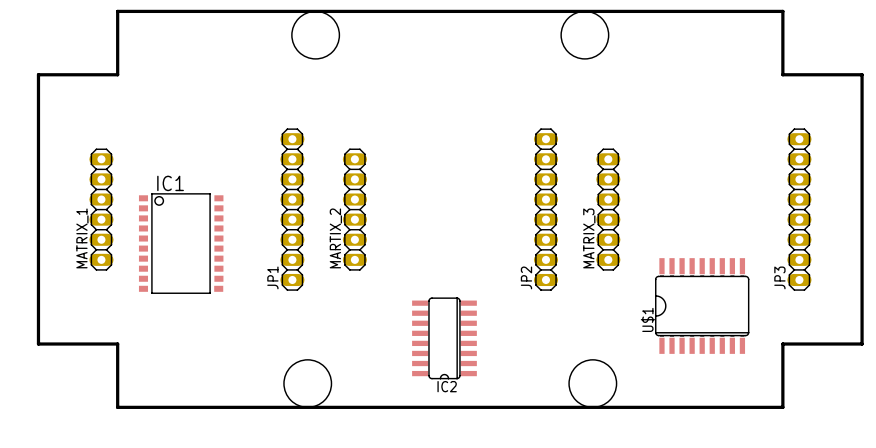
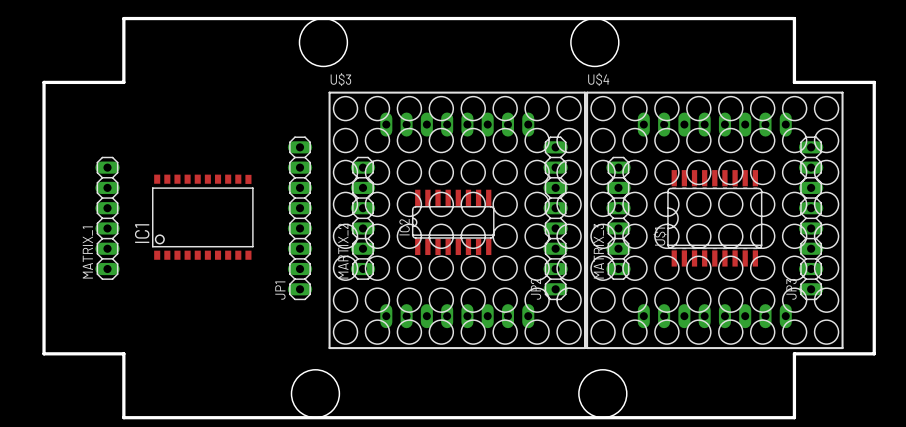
U$3: none -> (457, 220)
U$4: none -> (714, 220)
IC1 rotation: 0° (181, 243) -> 90° counterclockwise (202, 217)
U$1 position: (702, 306) -> (714, 218)
IC2 rotation: 0° (444, 338) -> 90° clockwise (453, 222)
IC2 position: (444, 338) -> (453, 222)

